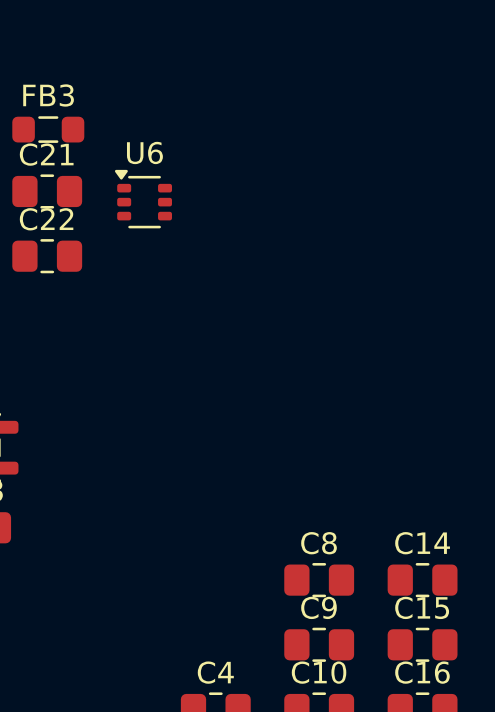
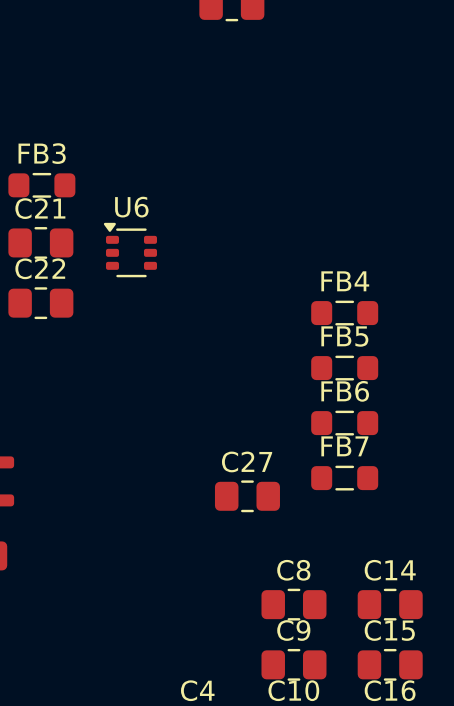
FB4: none -> (344, 313)
FB5: none -> (344, 368)
FB6: none -> (344, 423)
FB7: none -> (344, 478)
C27: none -> (247, 496)

